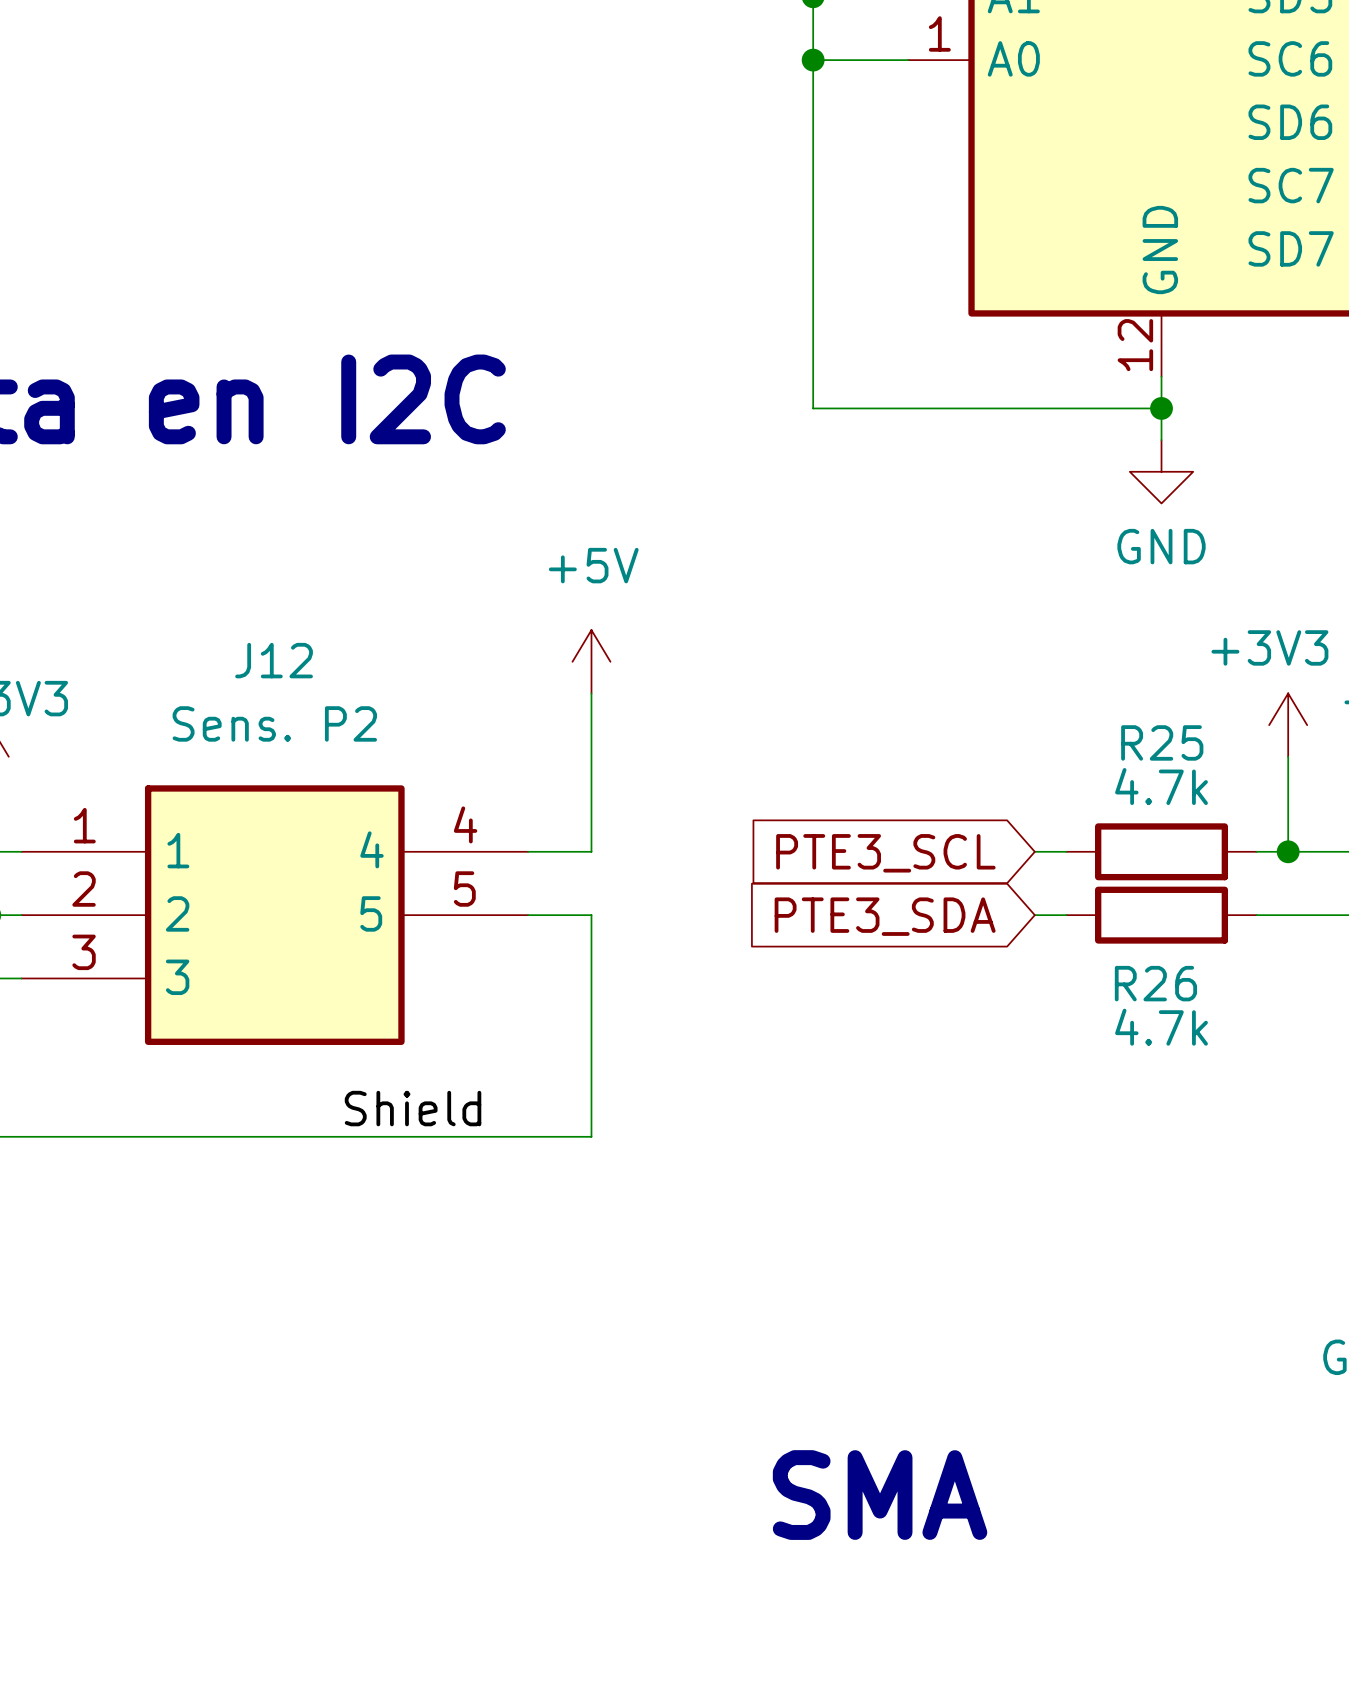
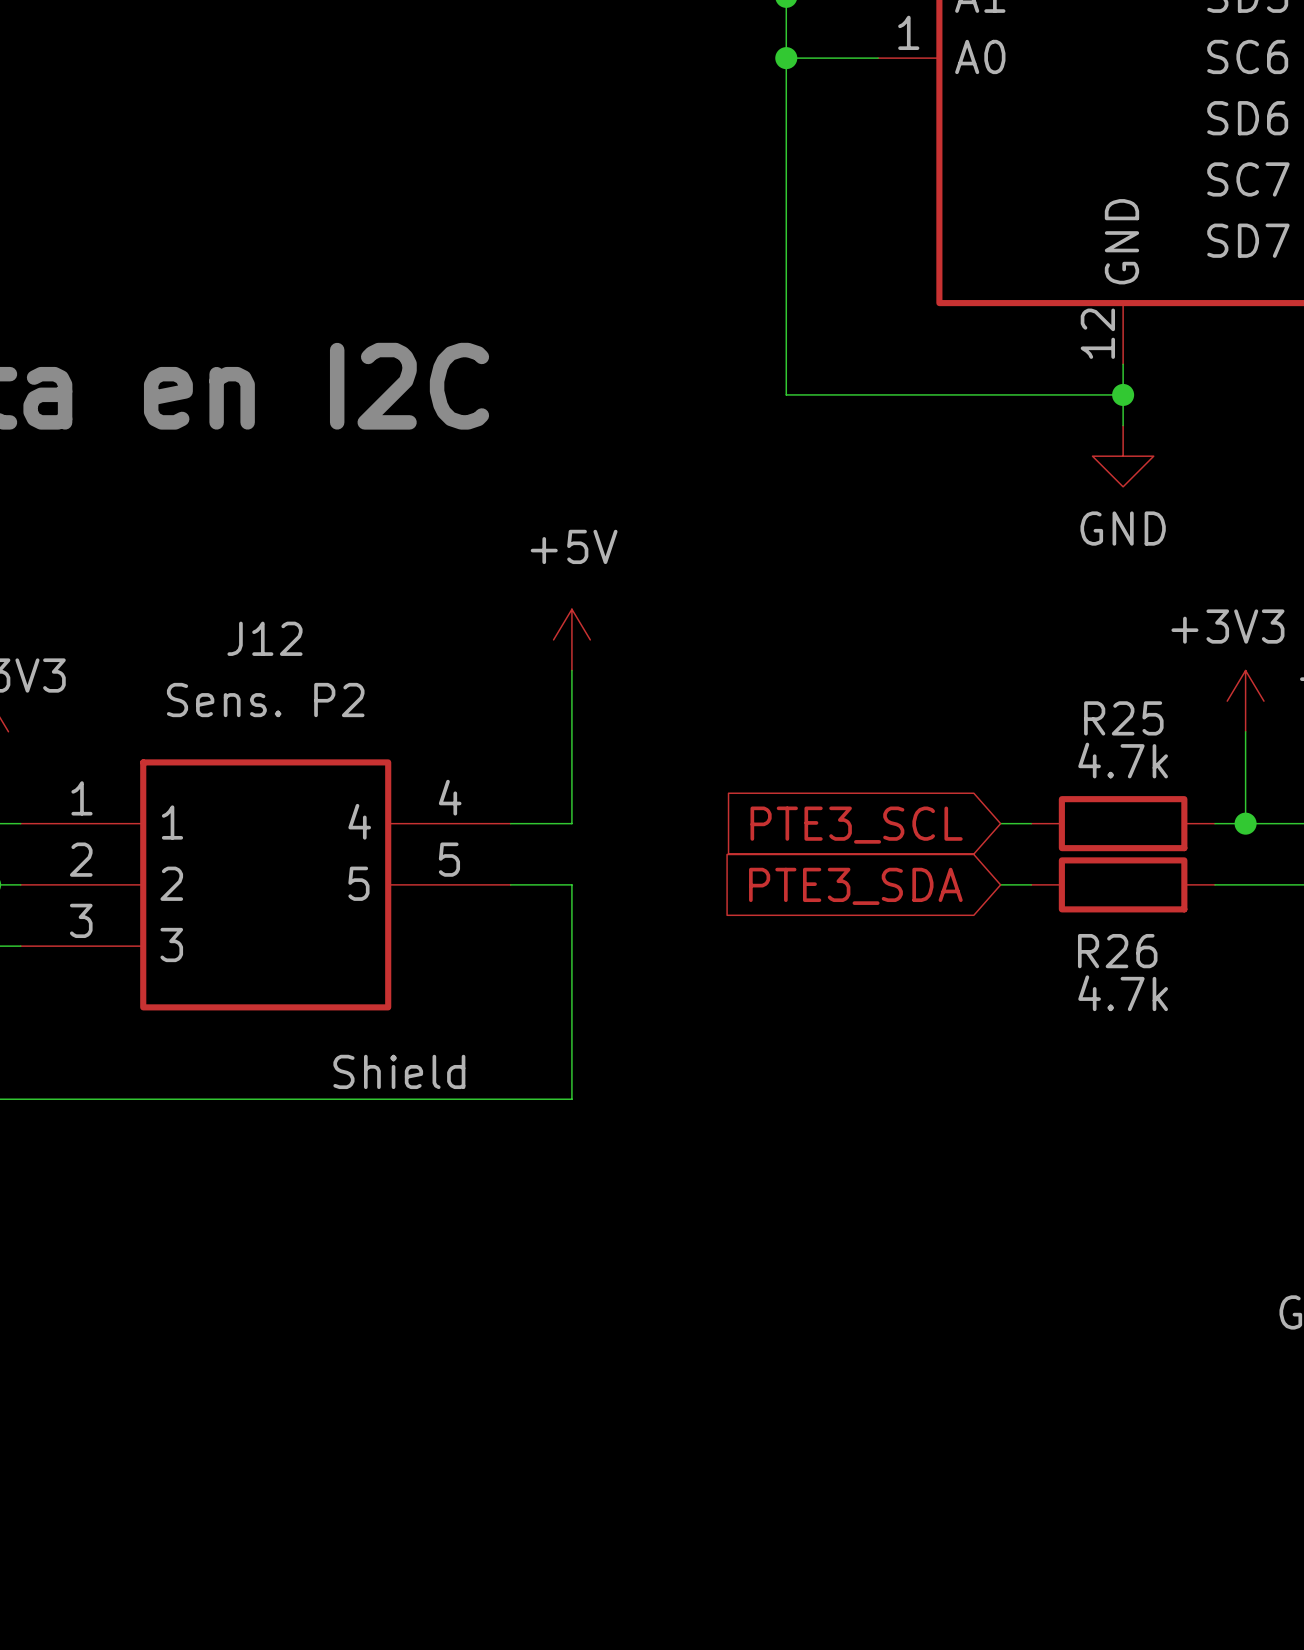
text: SMA (880, 1495) -> none

